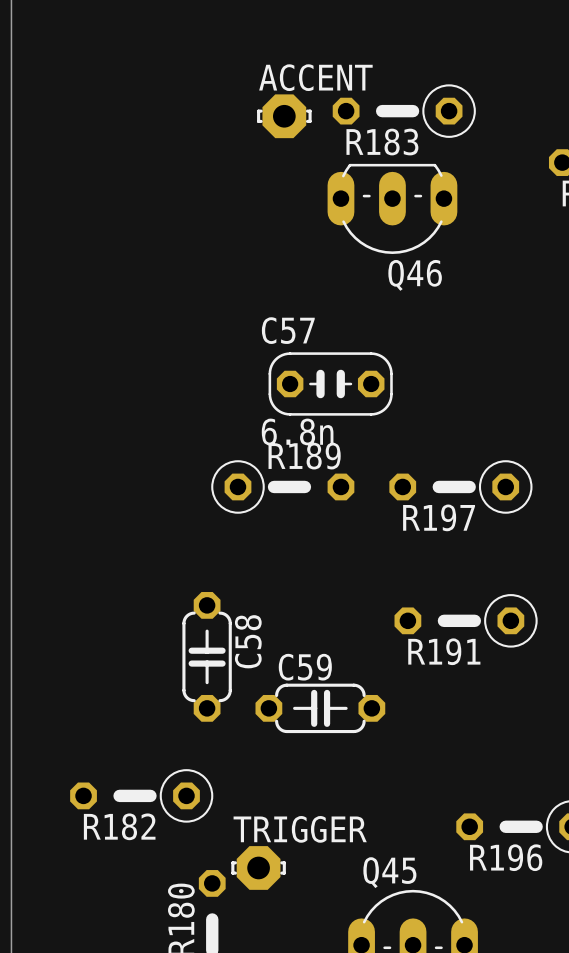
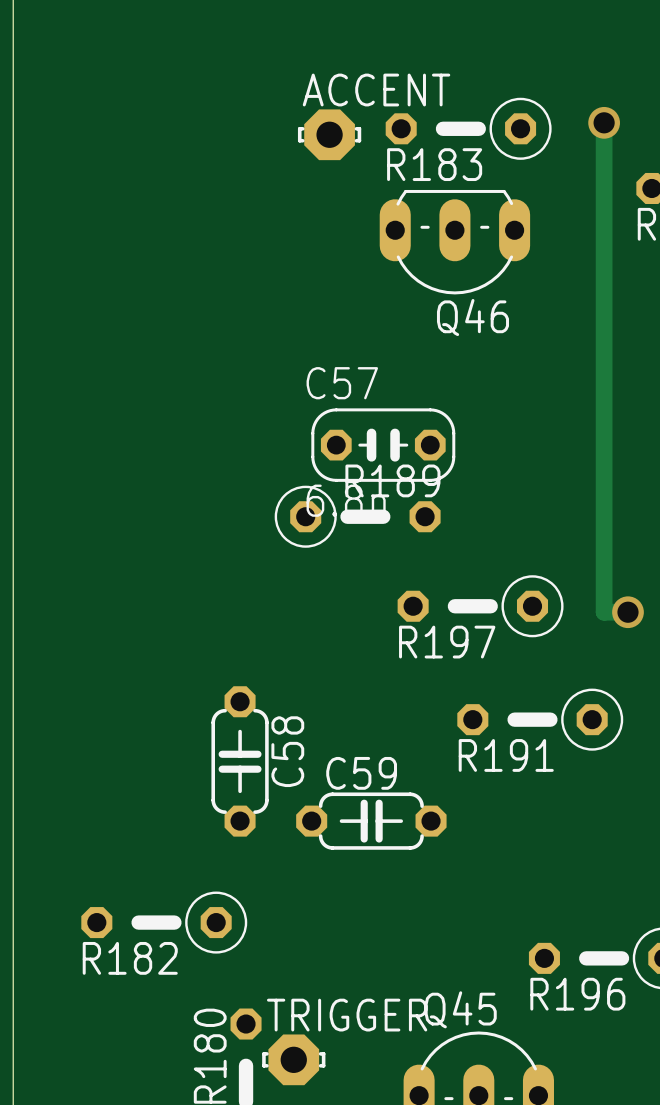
track: none -> (604, 122) (604, 612) (627, 612)
via: none -> (604, 122)
R189 position: (282, 486) -> (357, 516)
R197 position: (460, 486) -> (480, 606)
via: none -> (627, 612)
TRIGGER position: (258, 867) -> (293, 1059)

